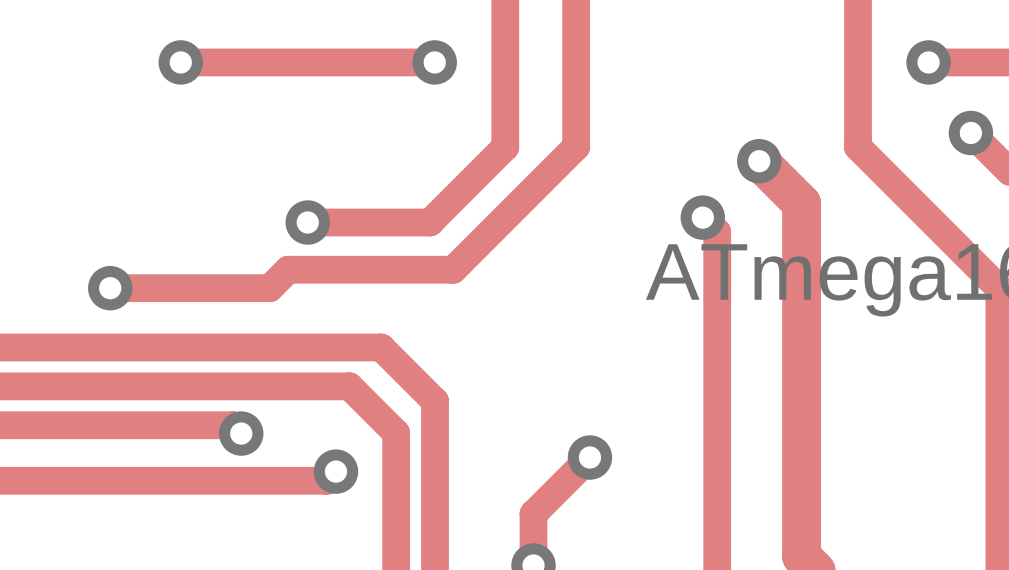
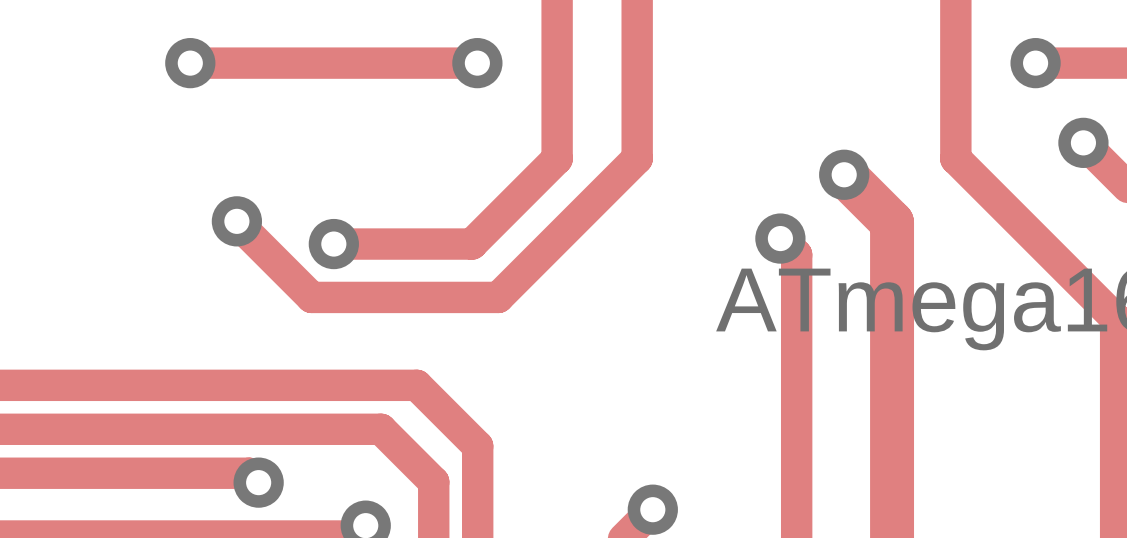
track: (288, 269) (269, 288) (110, 288) -> (311, 297) (236, 222)
via position: (110, 288) -> (236, 221)

